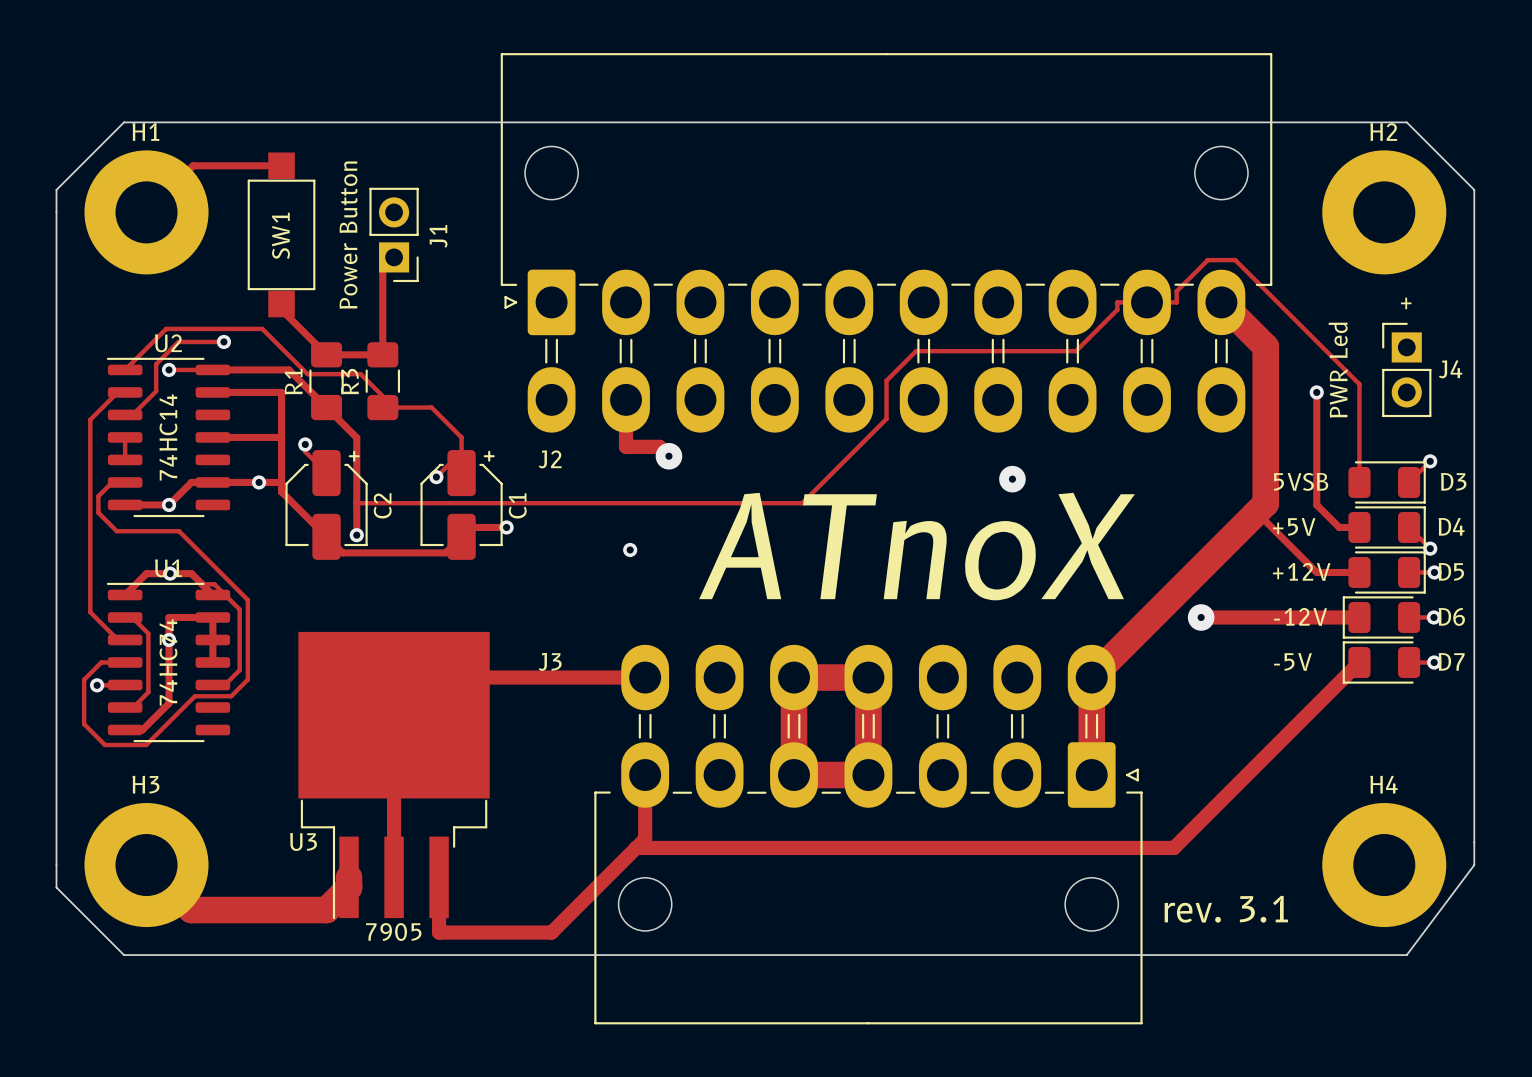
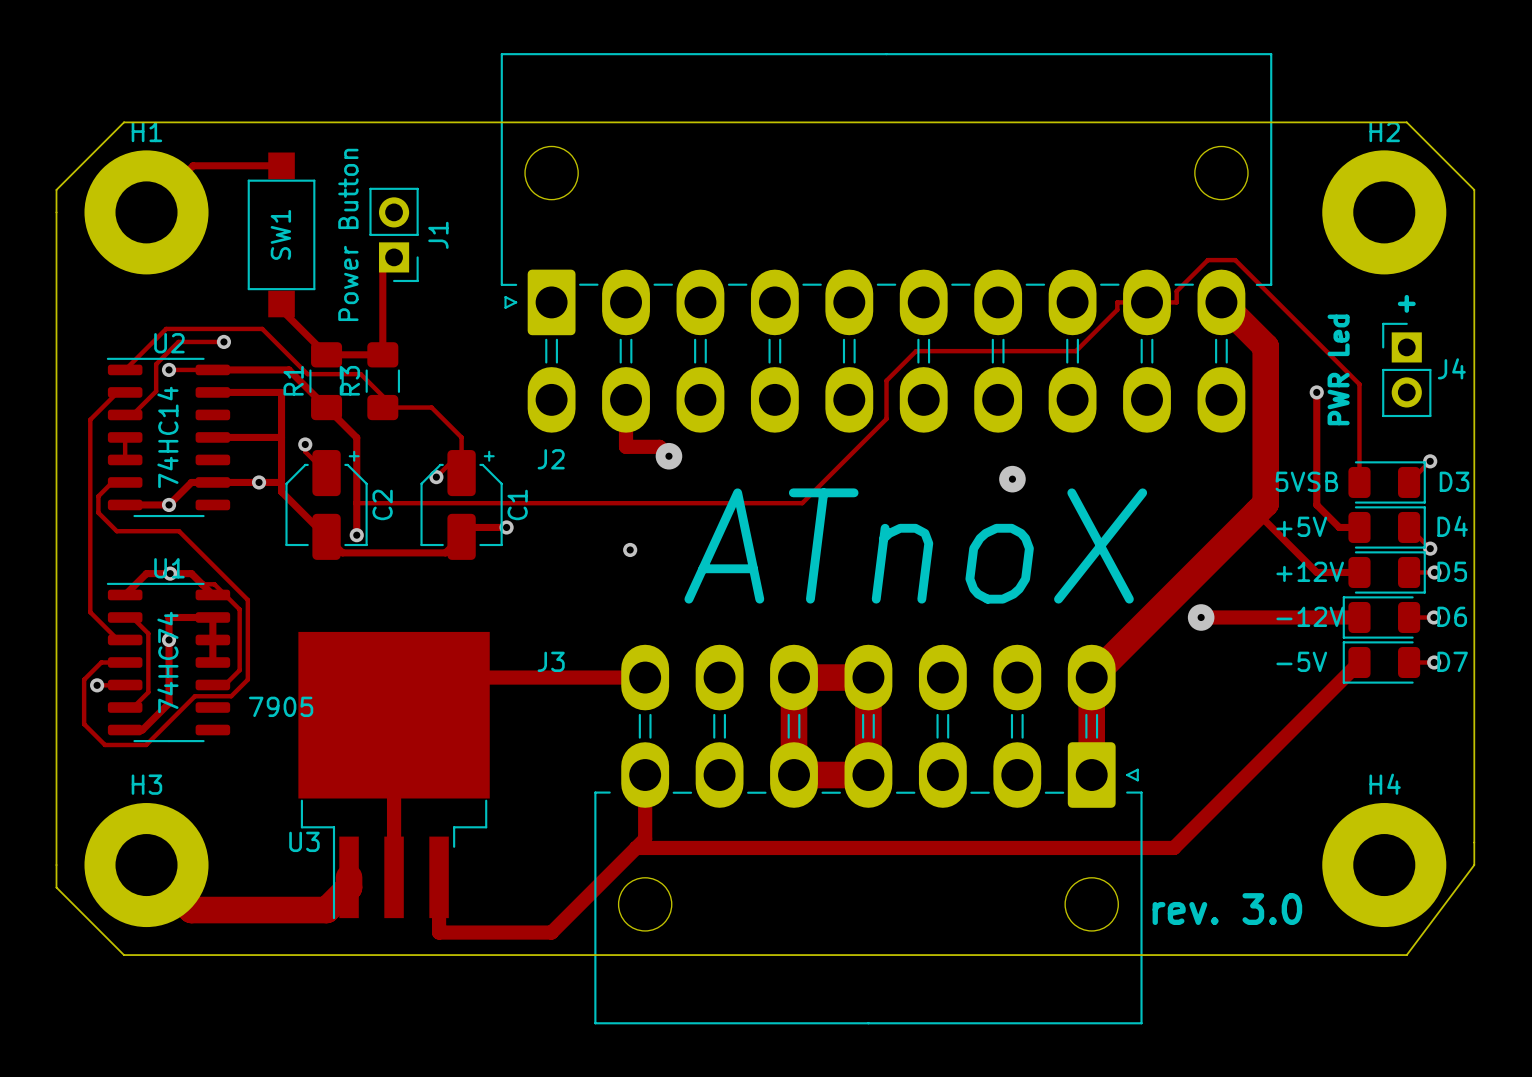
text: rev. 3.1 (1226, 909) -> rev. 3.0 (1227, 909)
text position: 7905 (393, 932) -> 7905 (281, 706)

